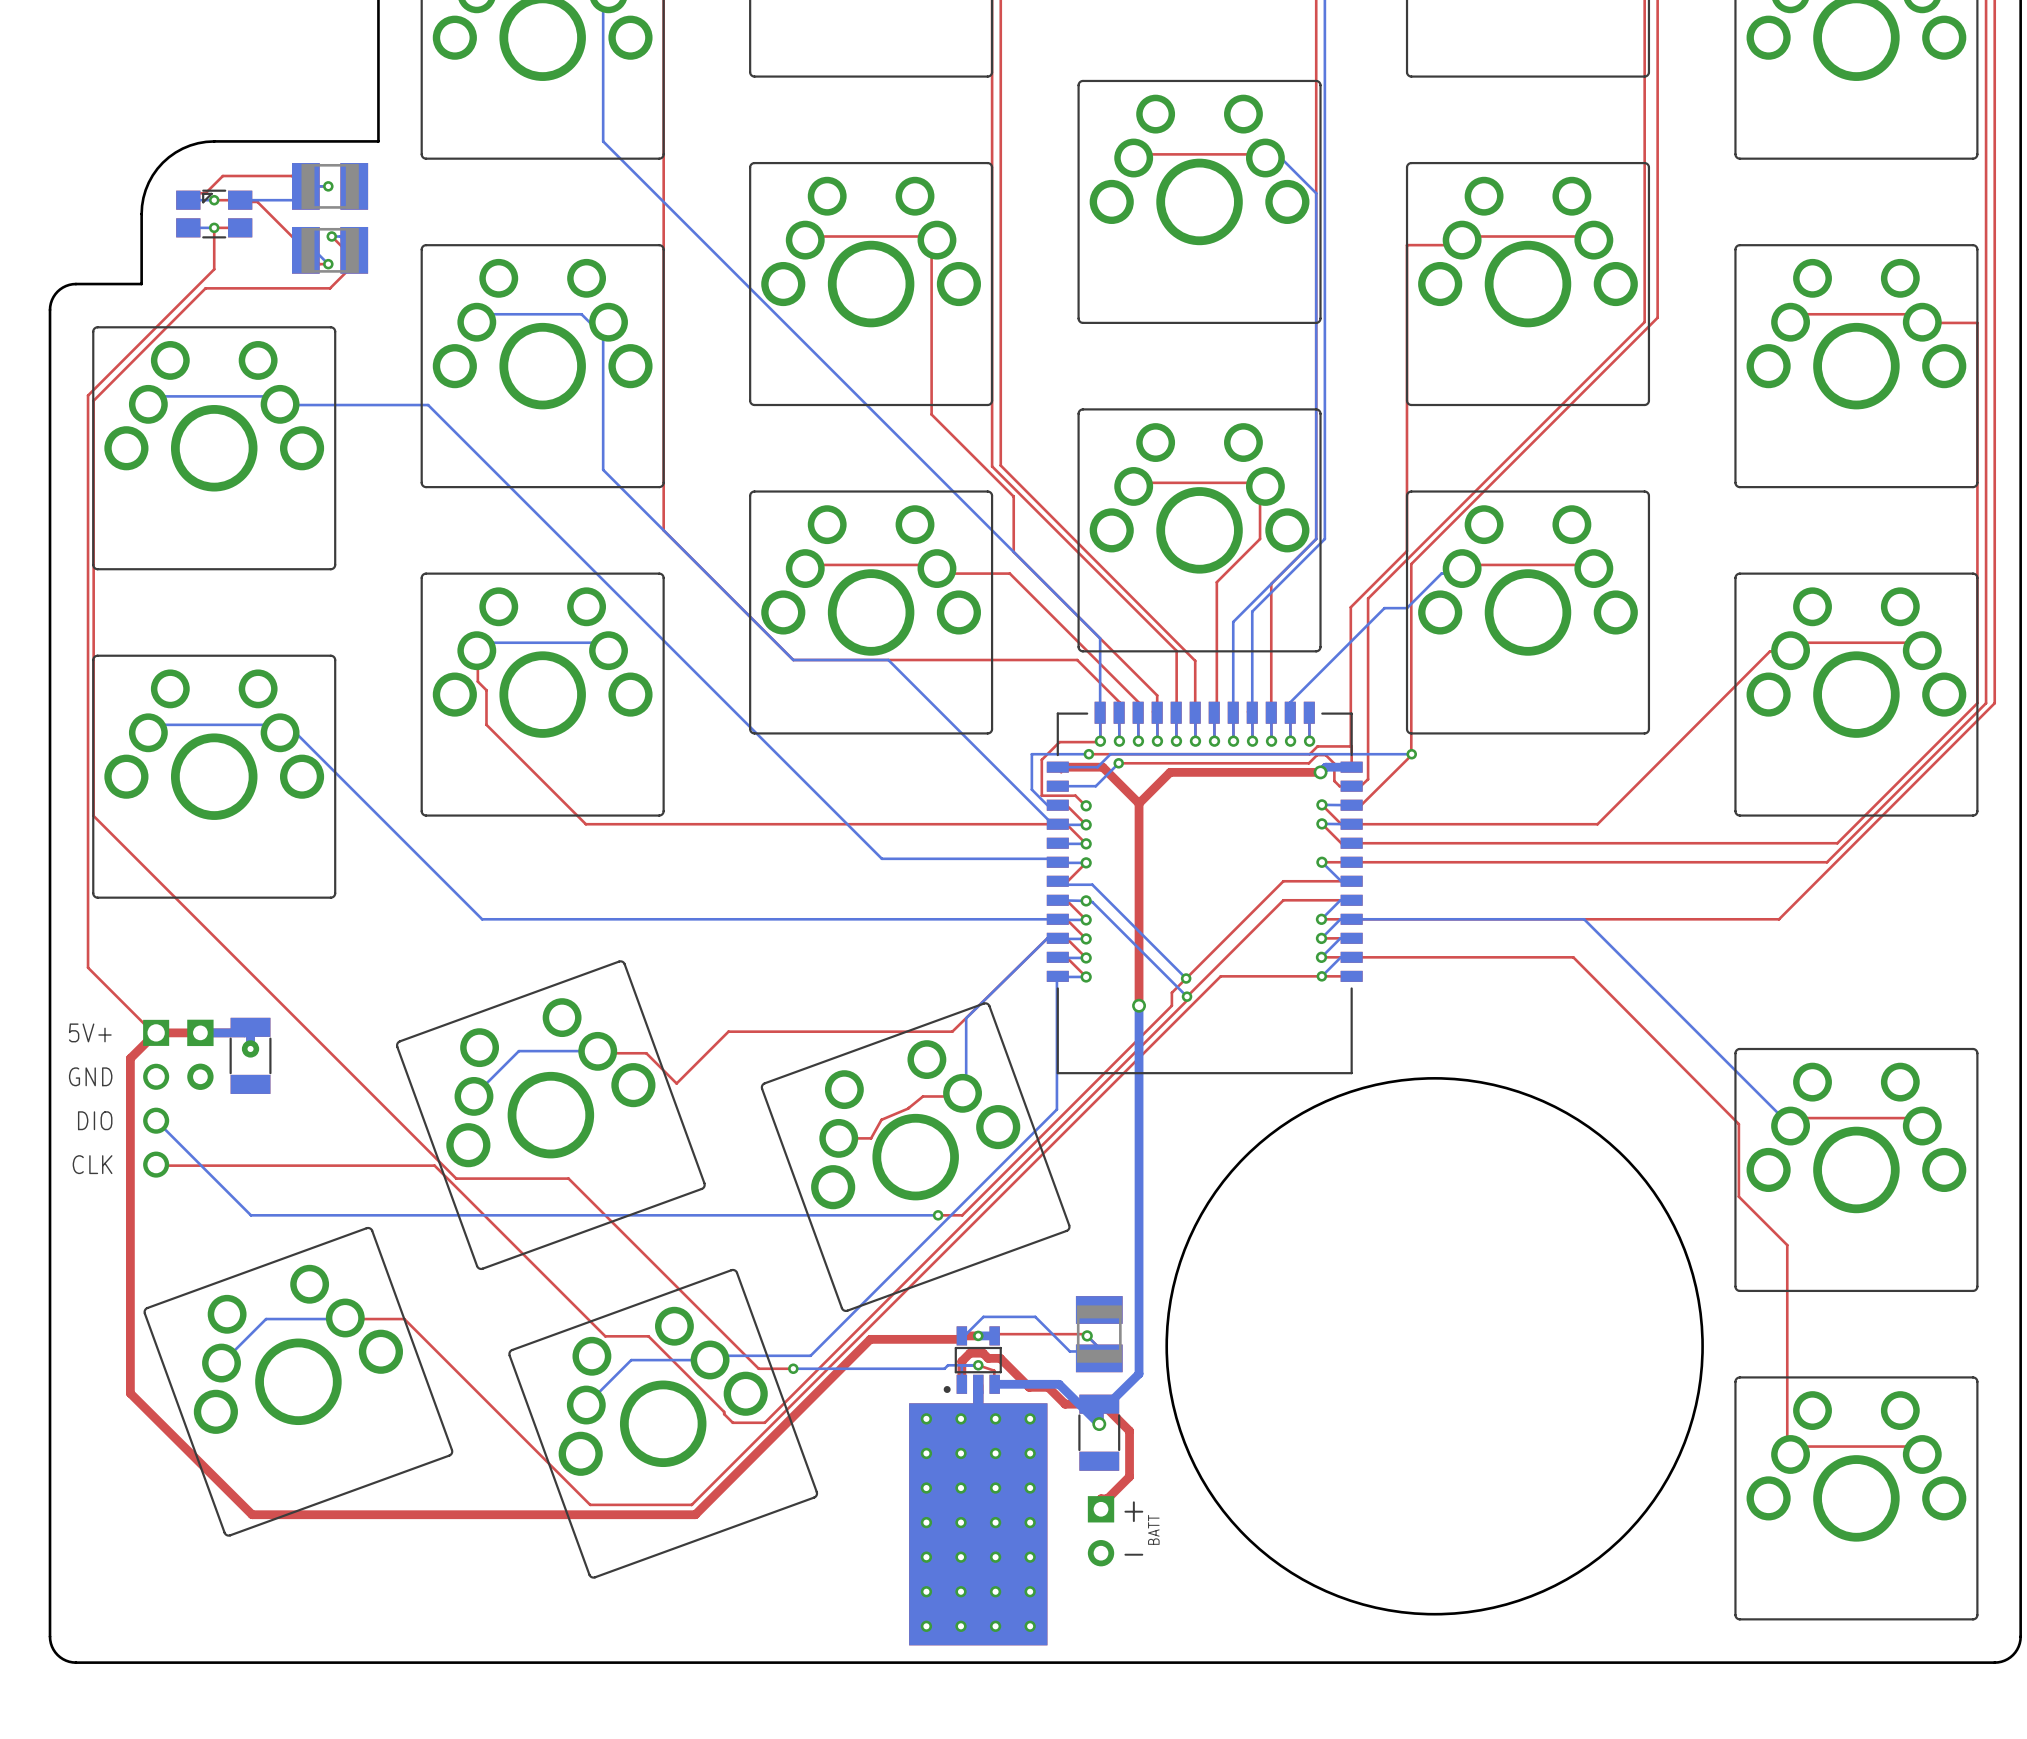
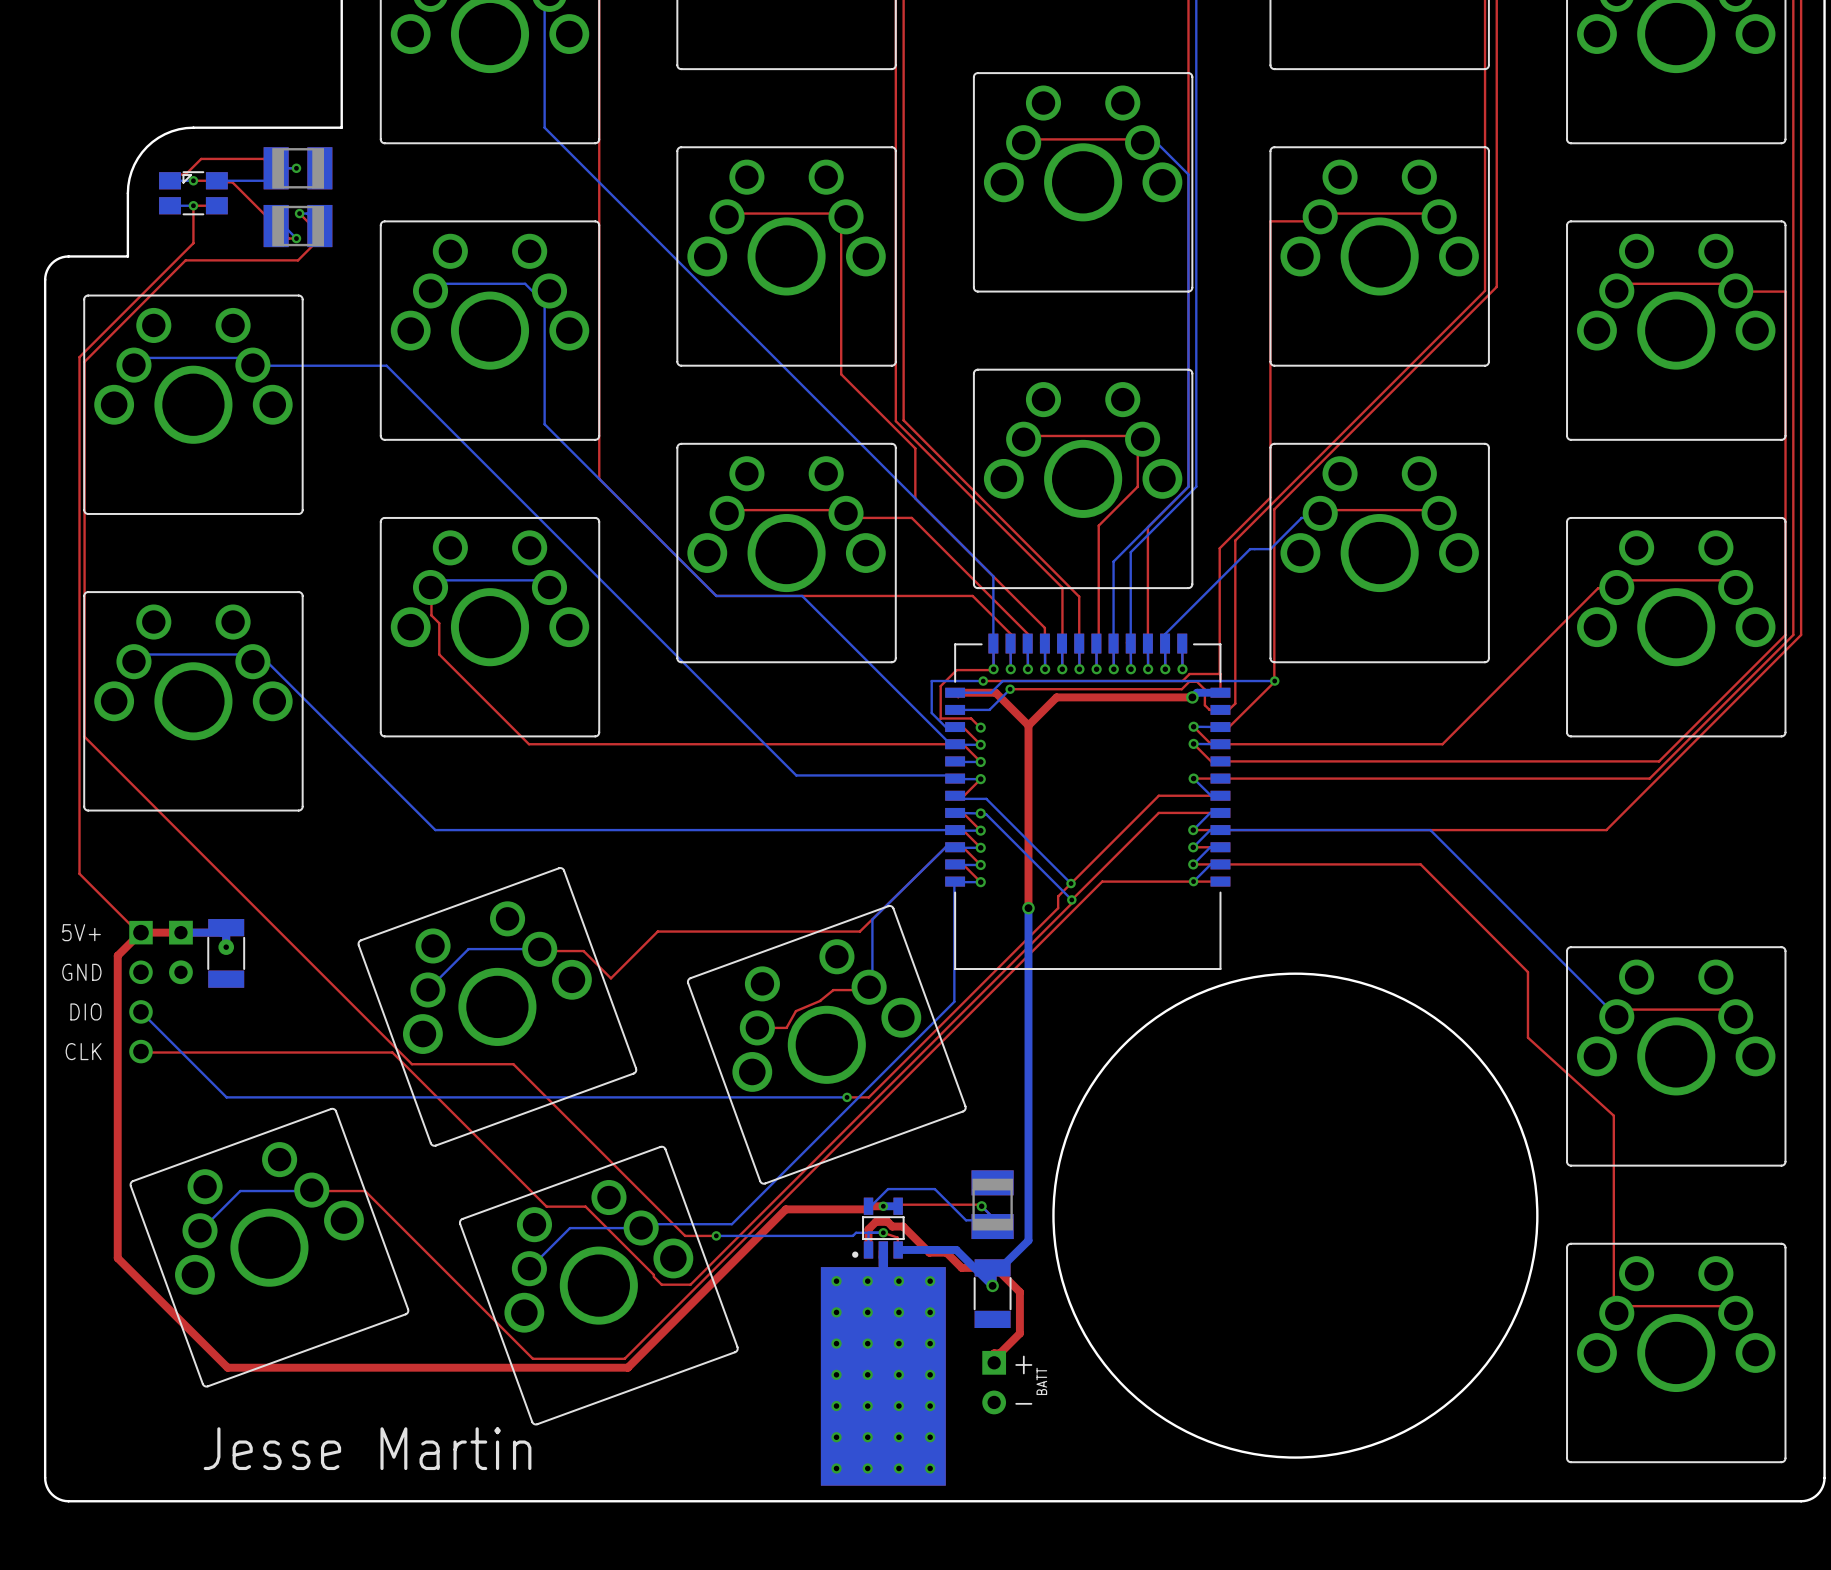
top track: (1573, 957) (1738, 1124) (1738, 1196) (1787, 1245) -> (1420, 864) (1527, 972) (1527, 1037) (1613, 1115) (1613, 1124)
text: none -> Jesse Martin (367, 1448)

